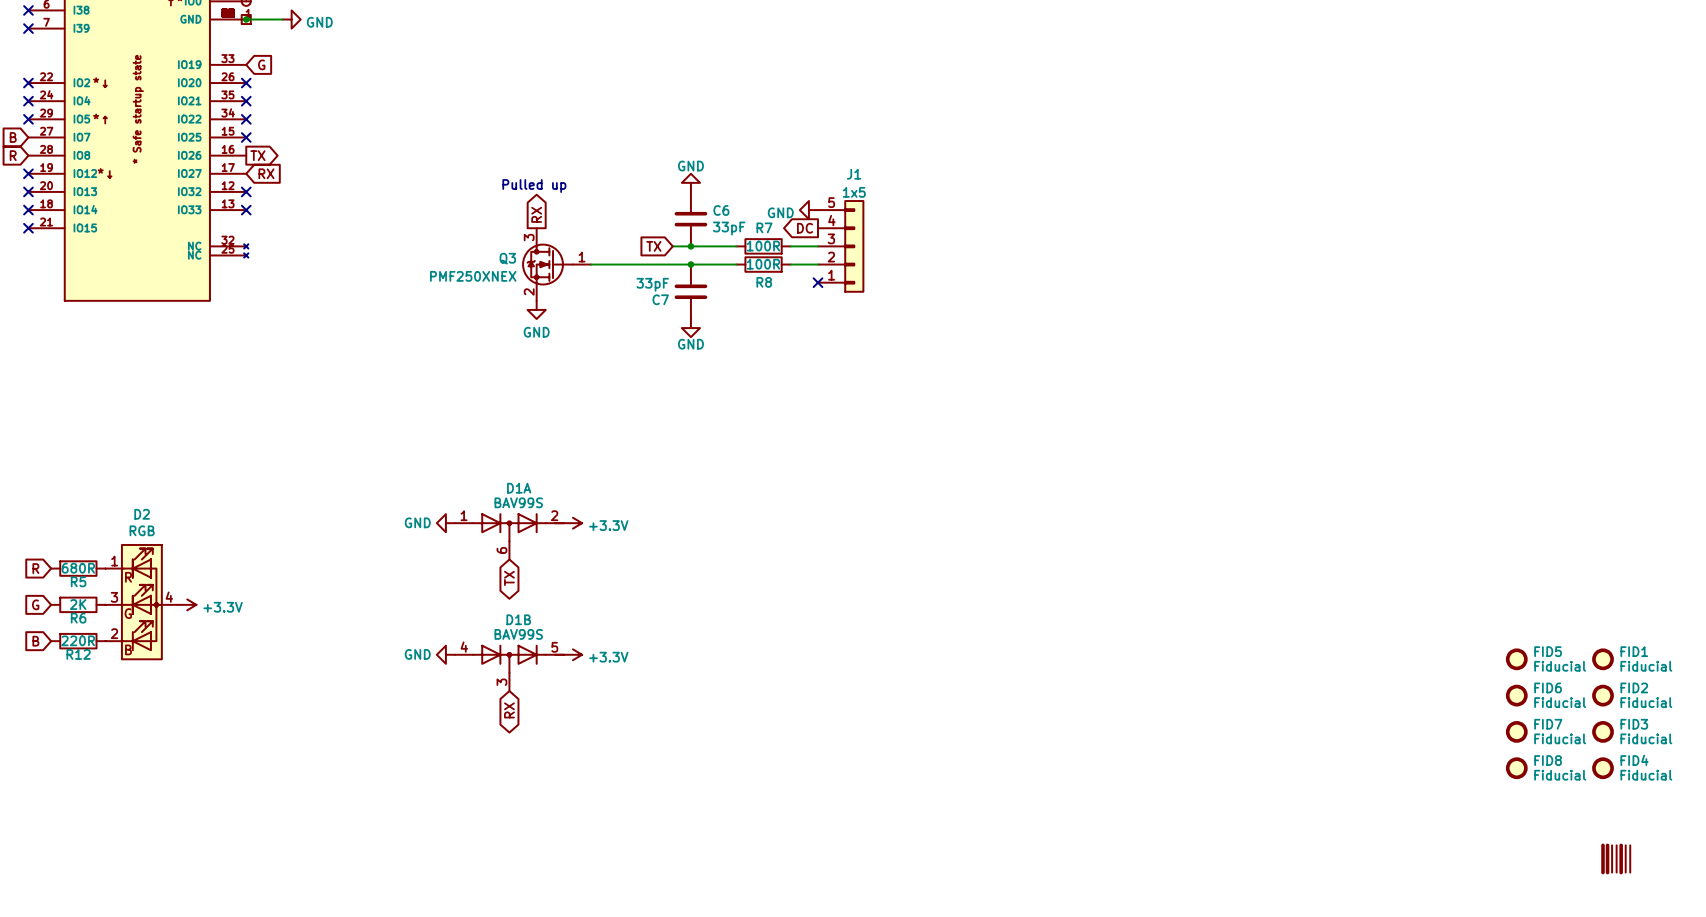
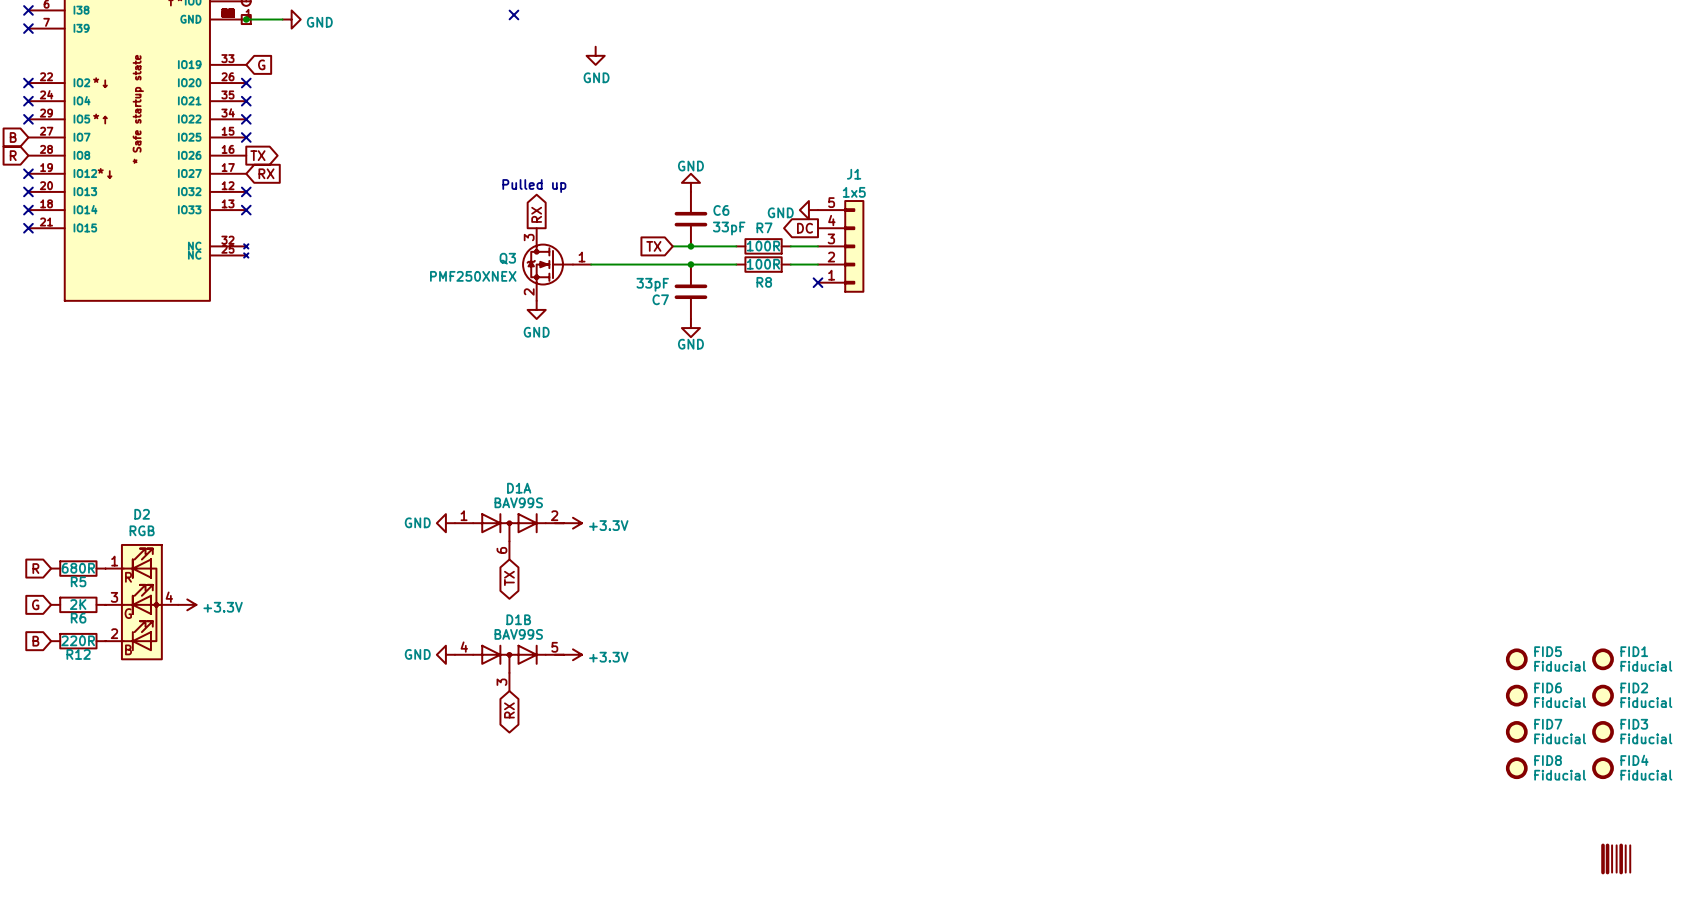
no-connect mark: none -> (513, 14)
power symbol: none -> GND (595, 55)

